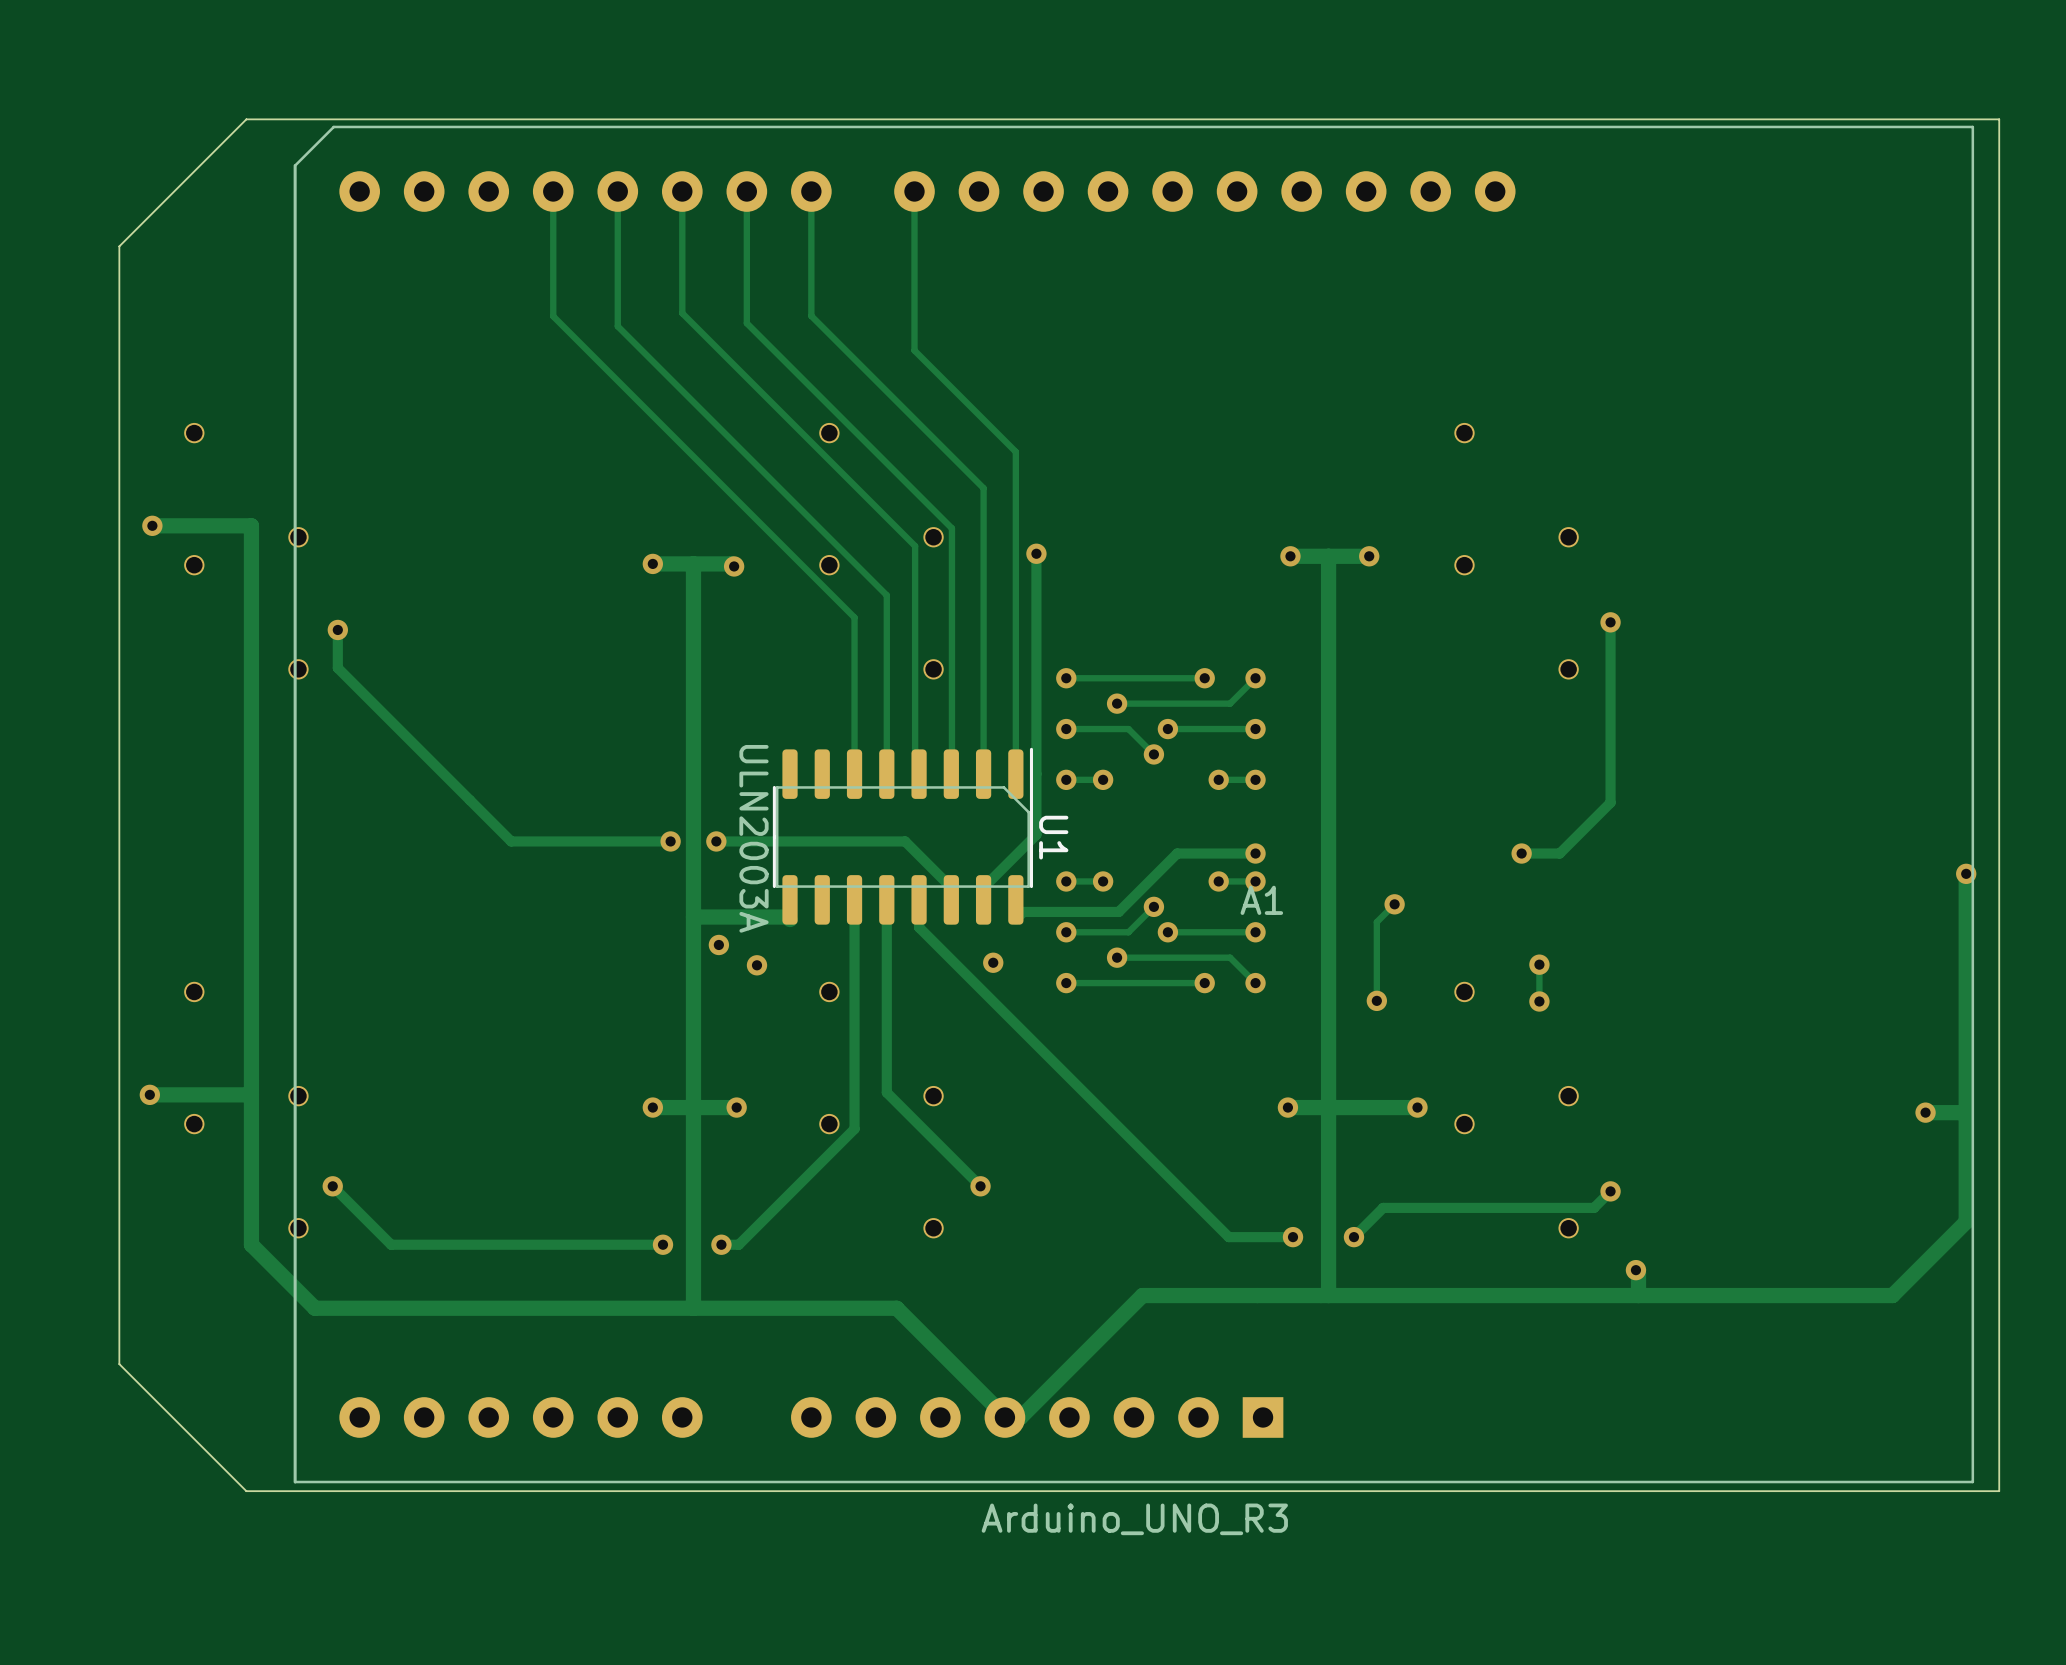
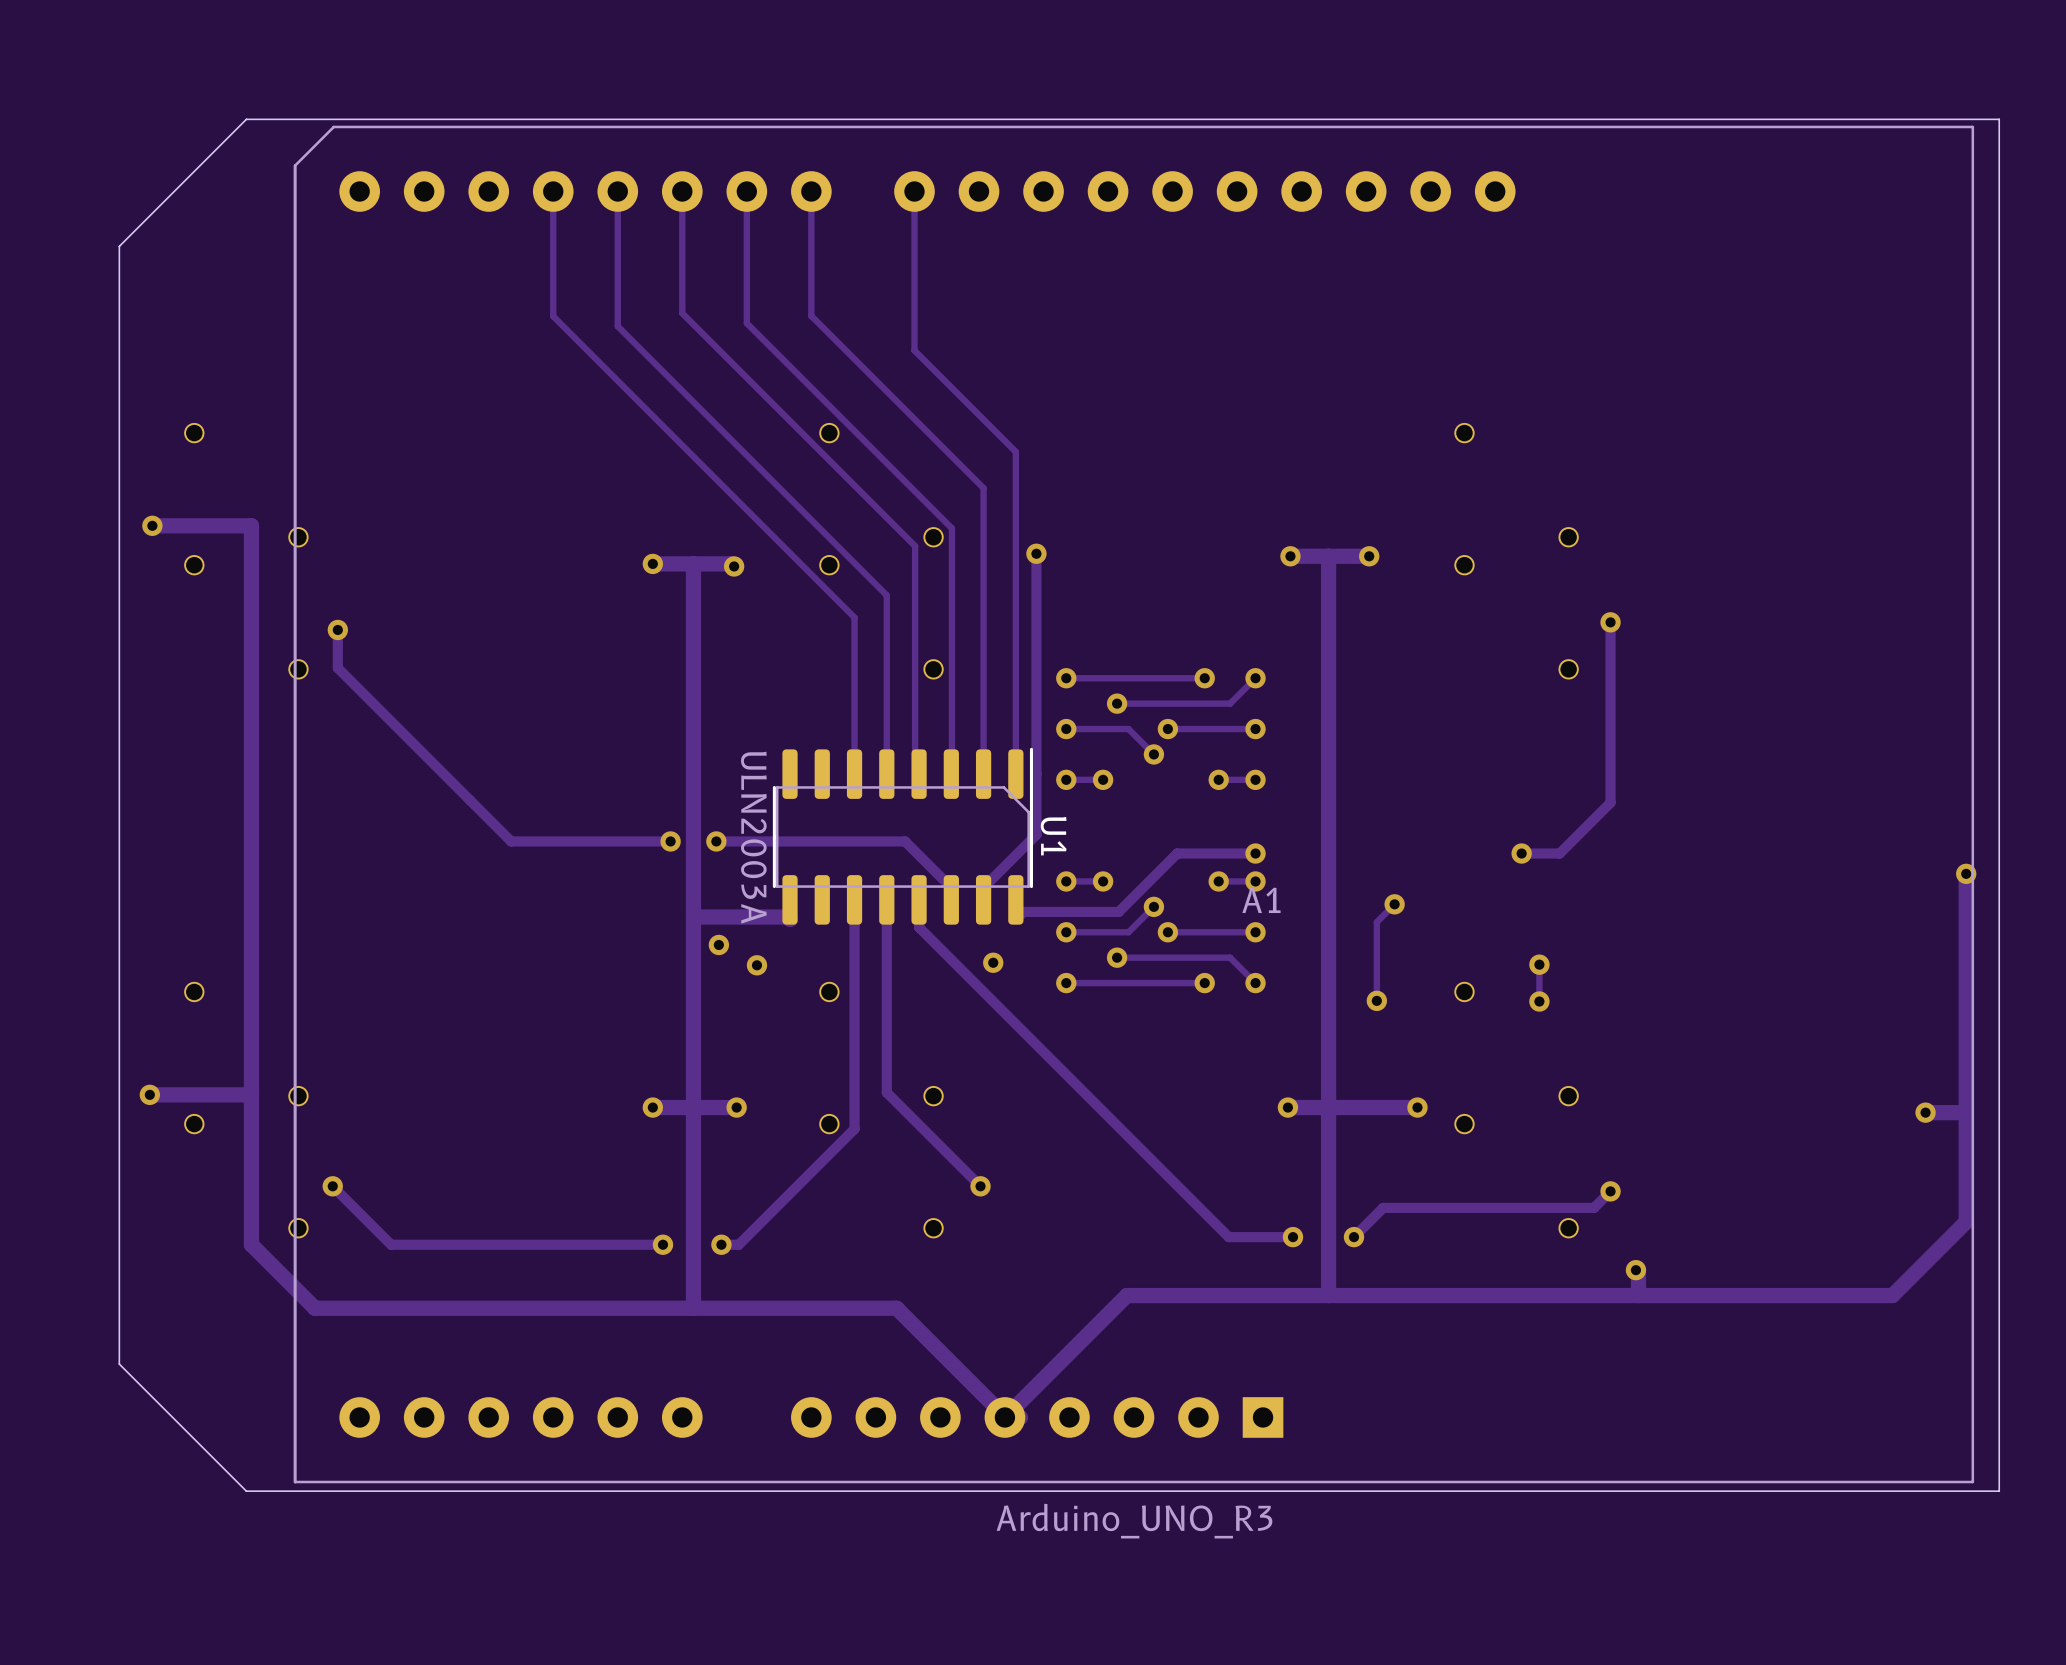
track: (1142, 1295) (1020, 1417) -> (1142, 1295) (1126, 1295) (1004, 1417)

